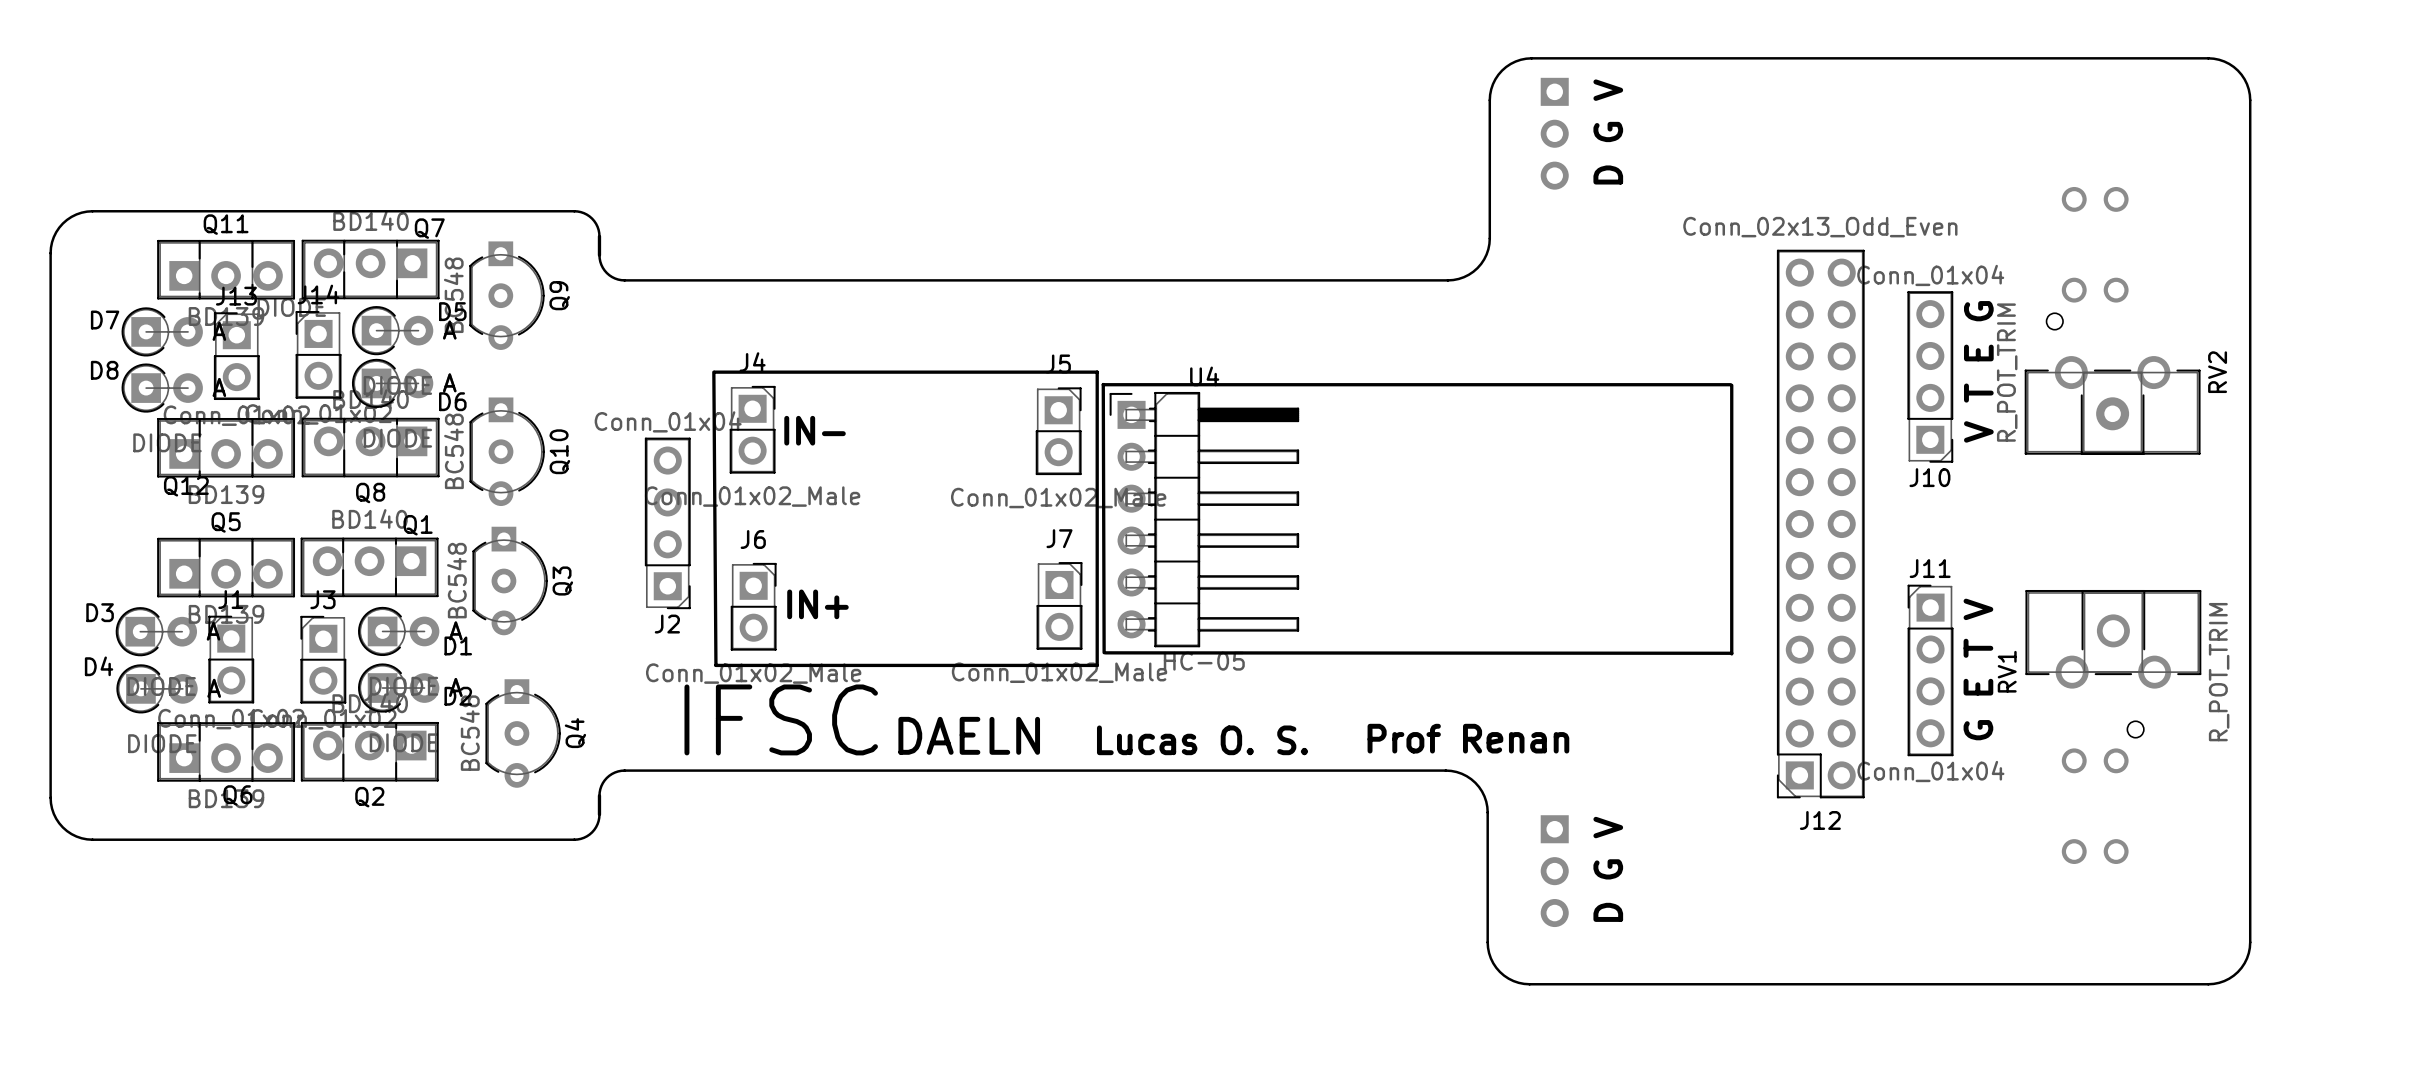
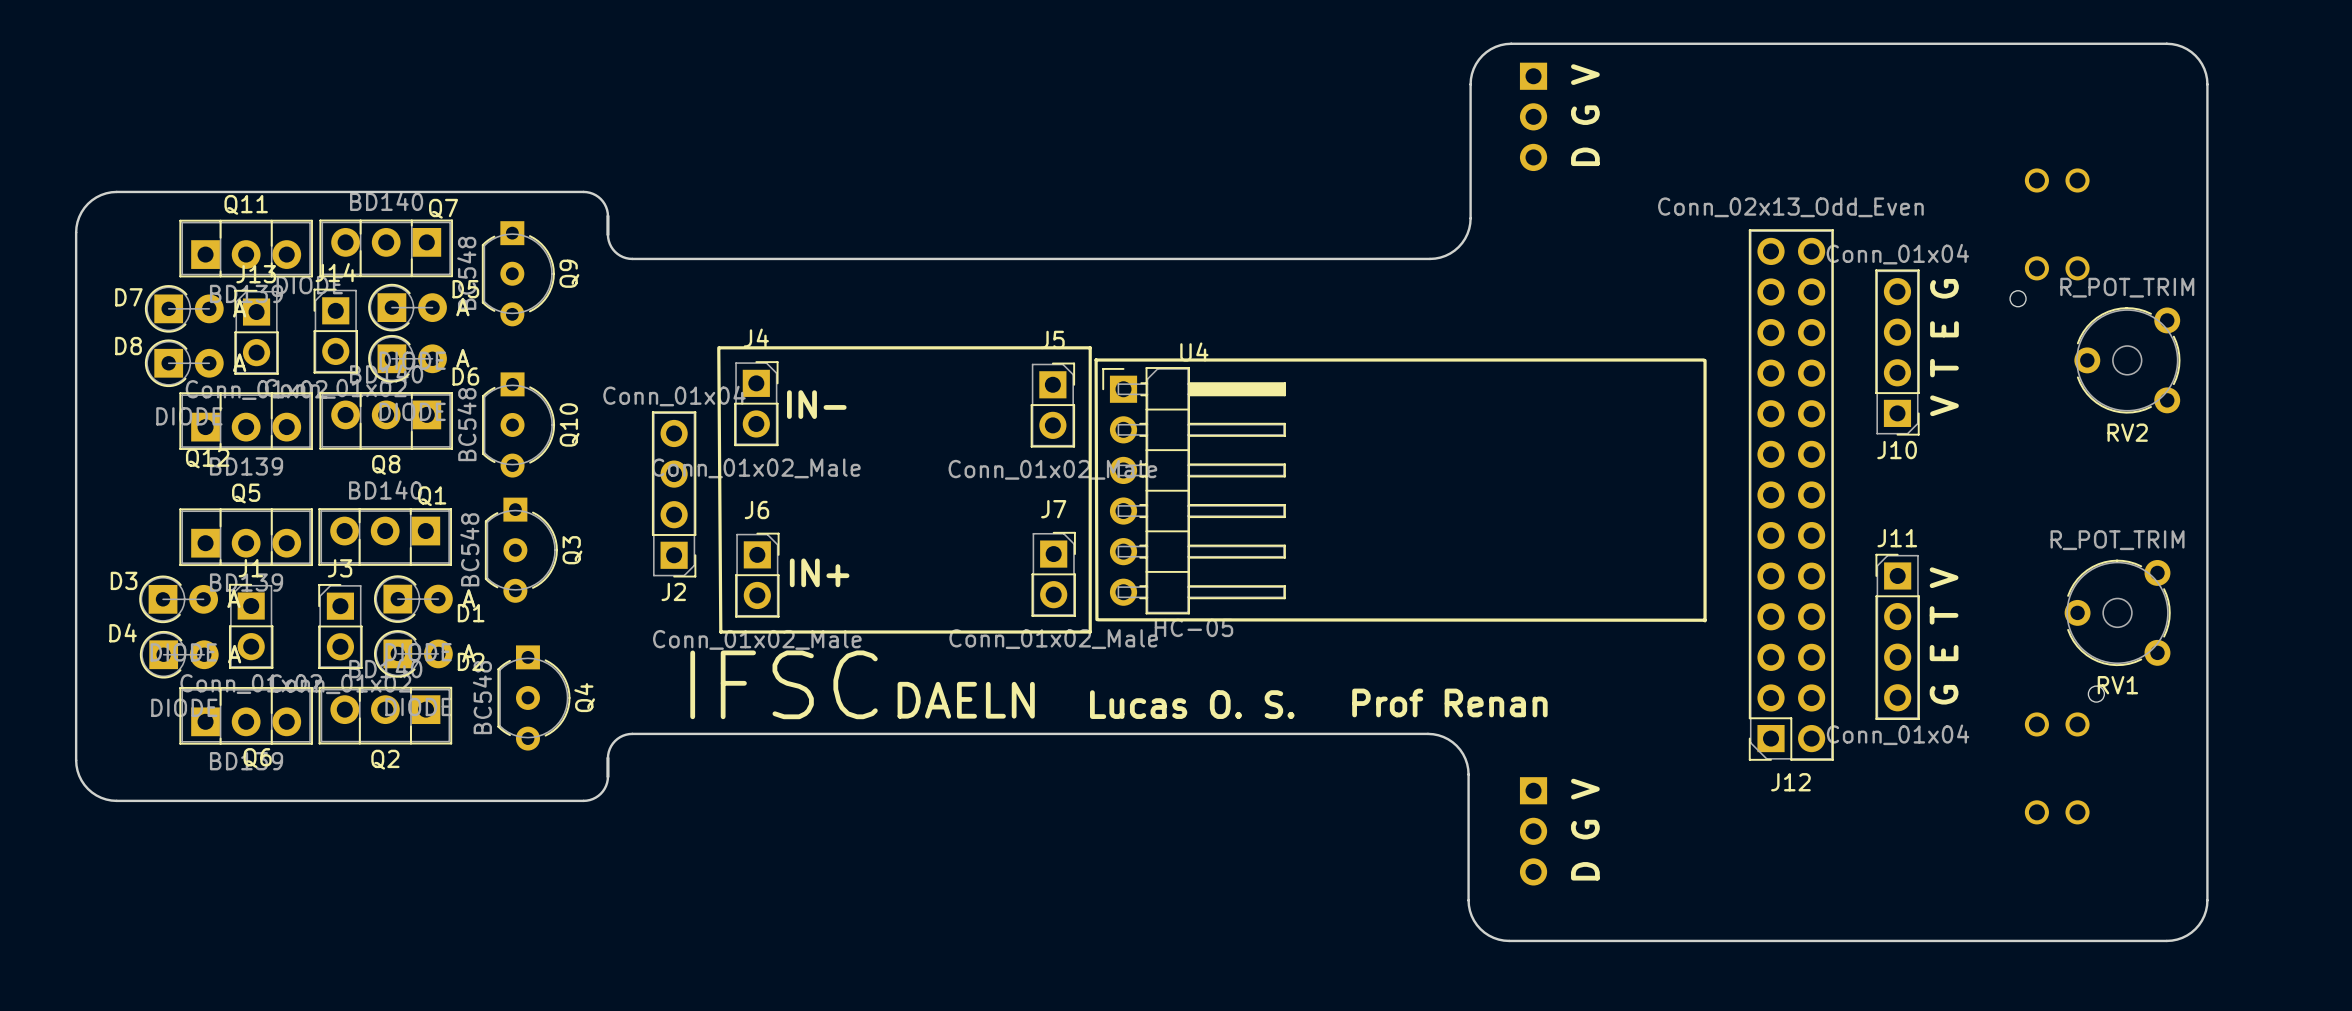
RV2 footprint: [2024, 356, 2201, 455] -> [2074, 307, 2181, 414]
RV2 value position: R_POT_TRIM (2007, 372) -> R_POT_TRIM (2127, 287)
RV2 name position: RV2 (2217, 372) -> RV2 (2127, 432)
RV1 footprint: [2025, 589, 2202, 689] -> [2064, 559, 2171, 667]
RV1 name position: RV1 (2007, 671) -> RV1 (2117, 685)
RV1 value position: R_POT_TRIM (2219, 672) -> R_POT_TRIM (2117, 540)

